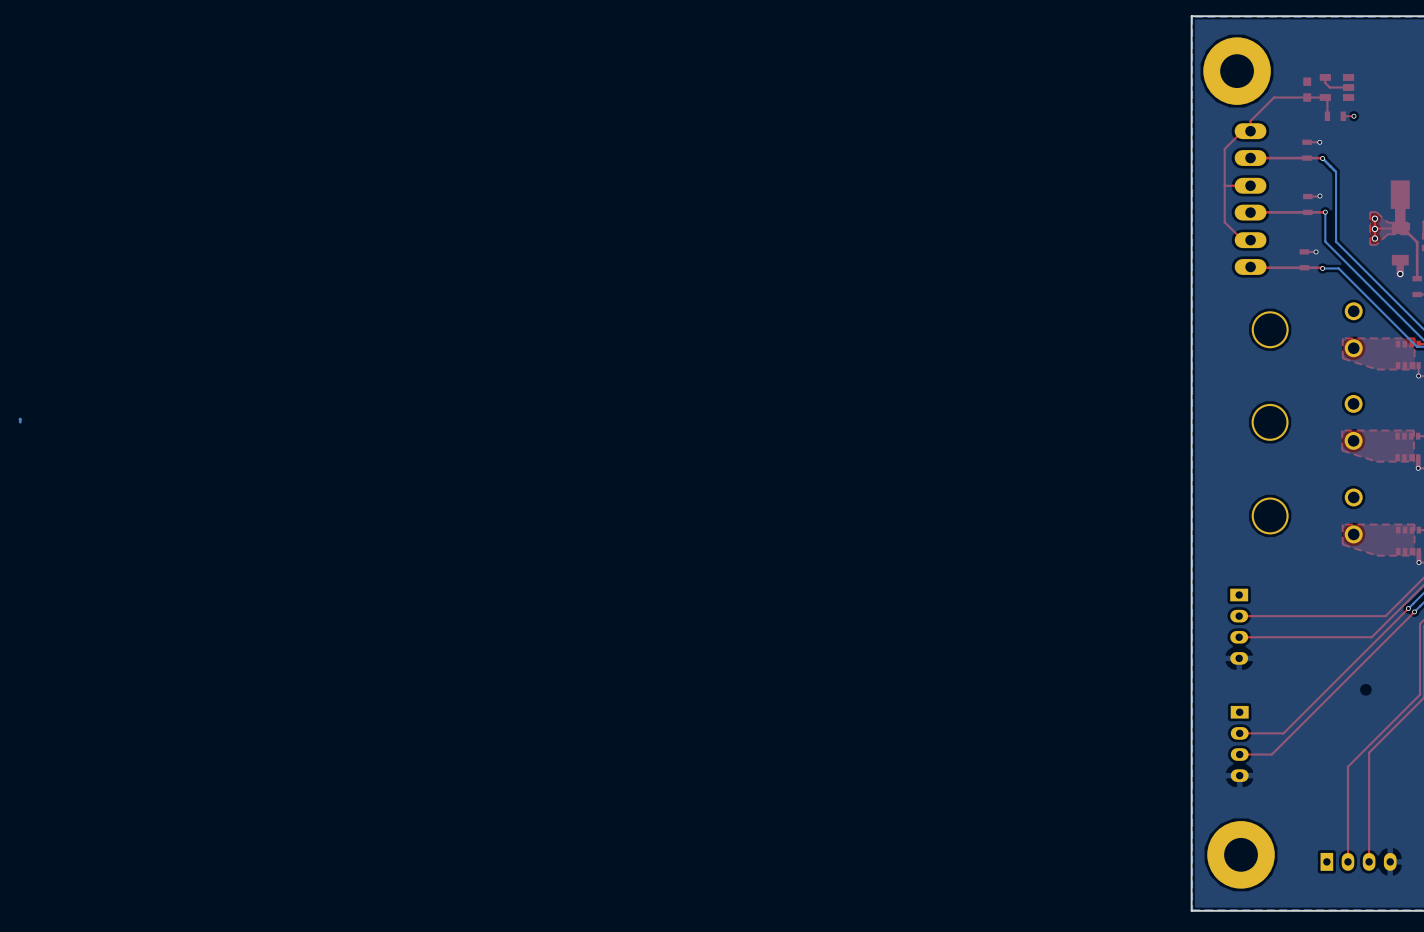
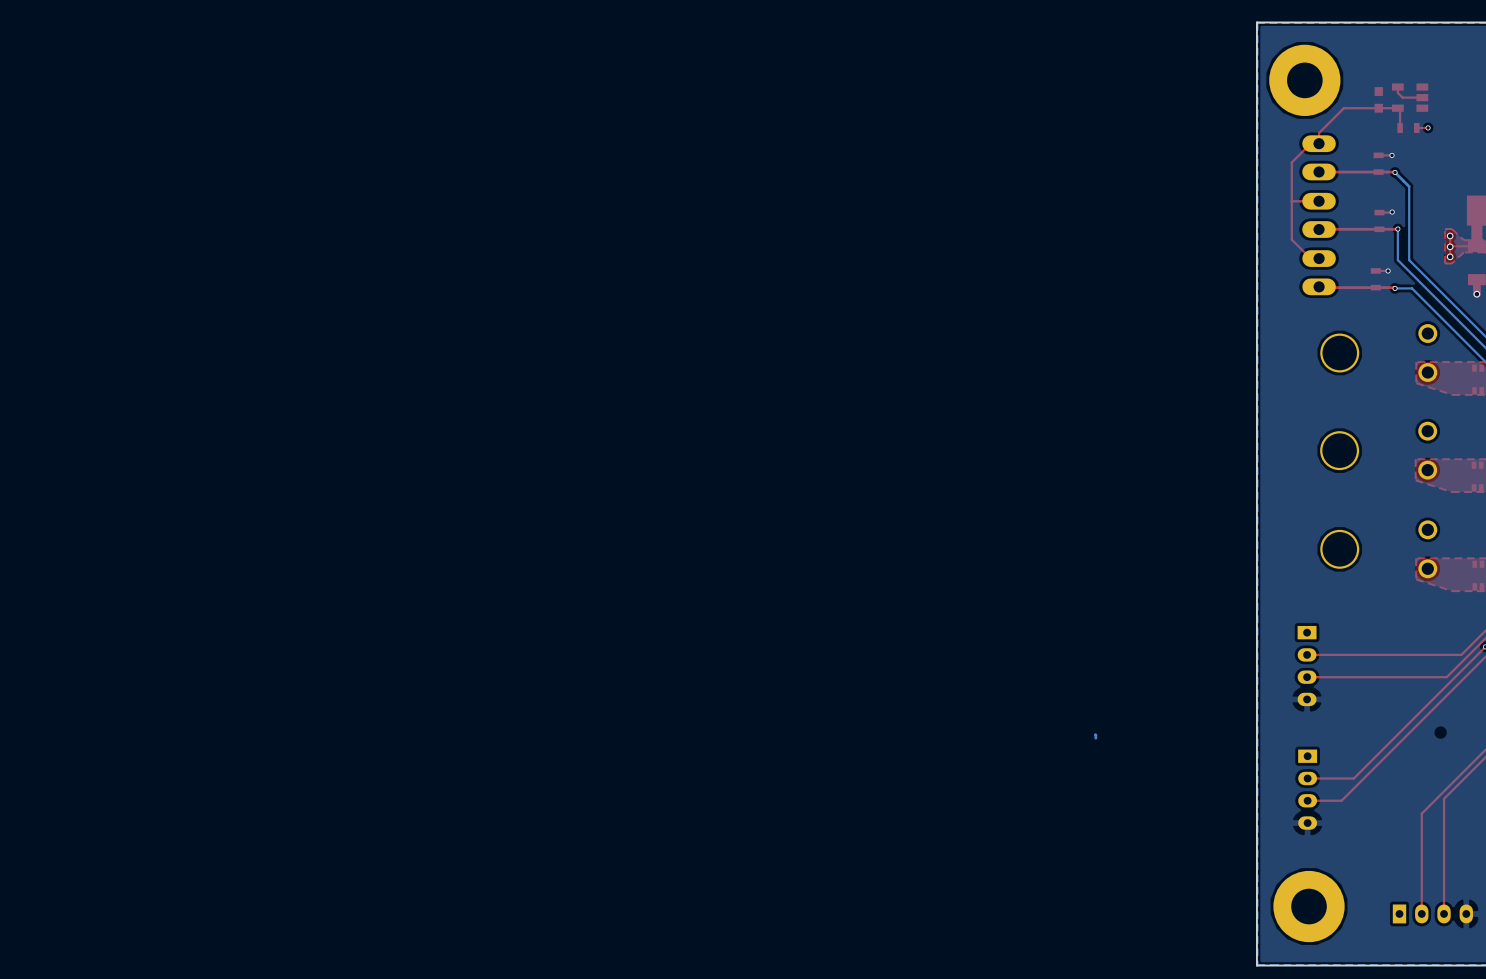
bottom track: (19, 418) (20, 422) -> none
bottom track: none -> (1095, 734) (1095, 738)

